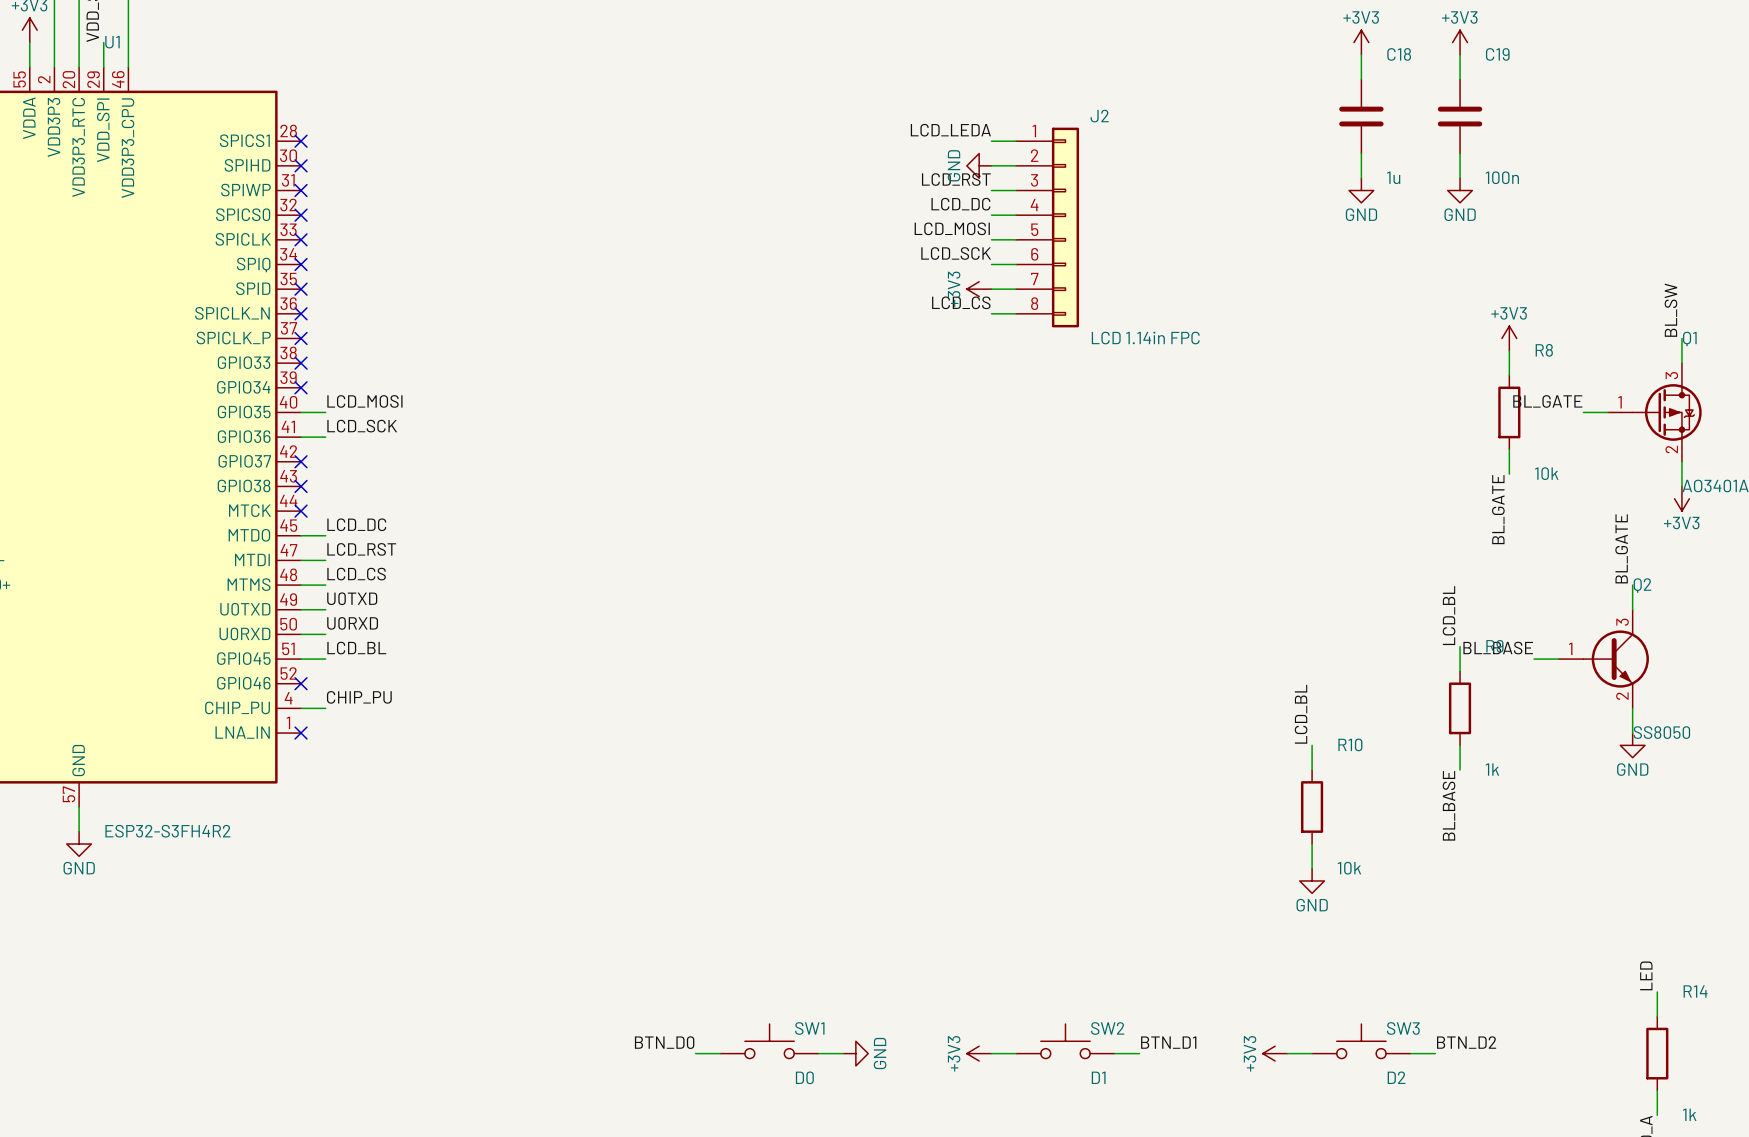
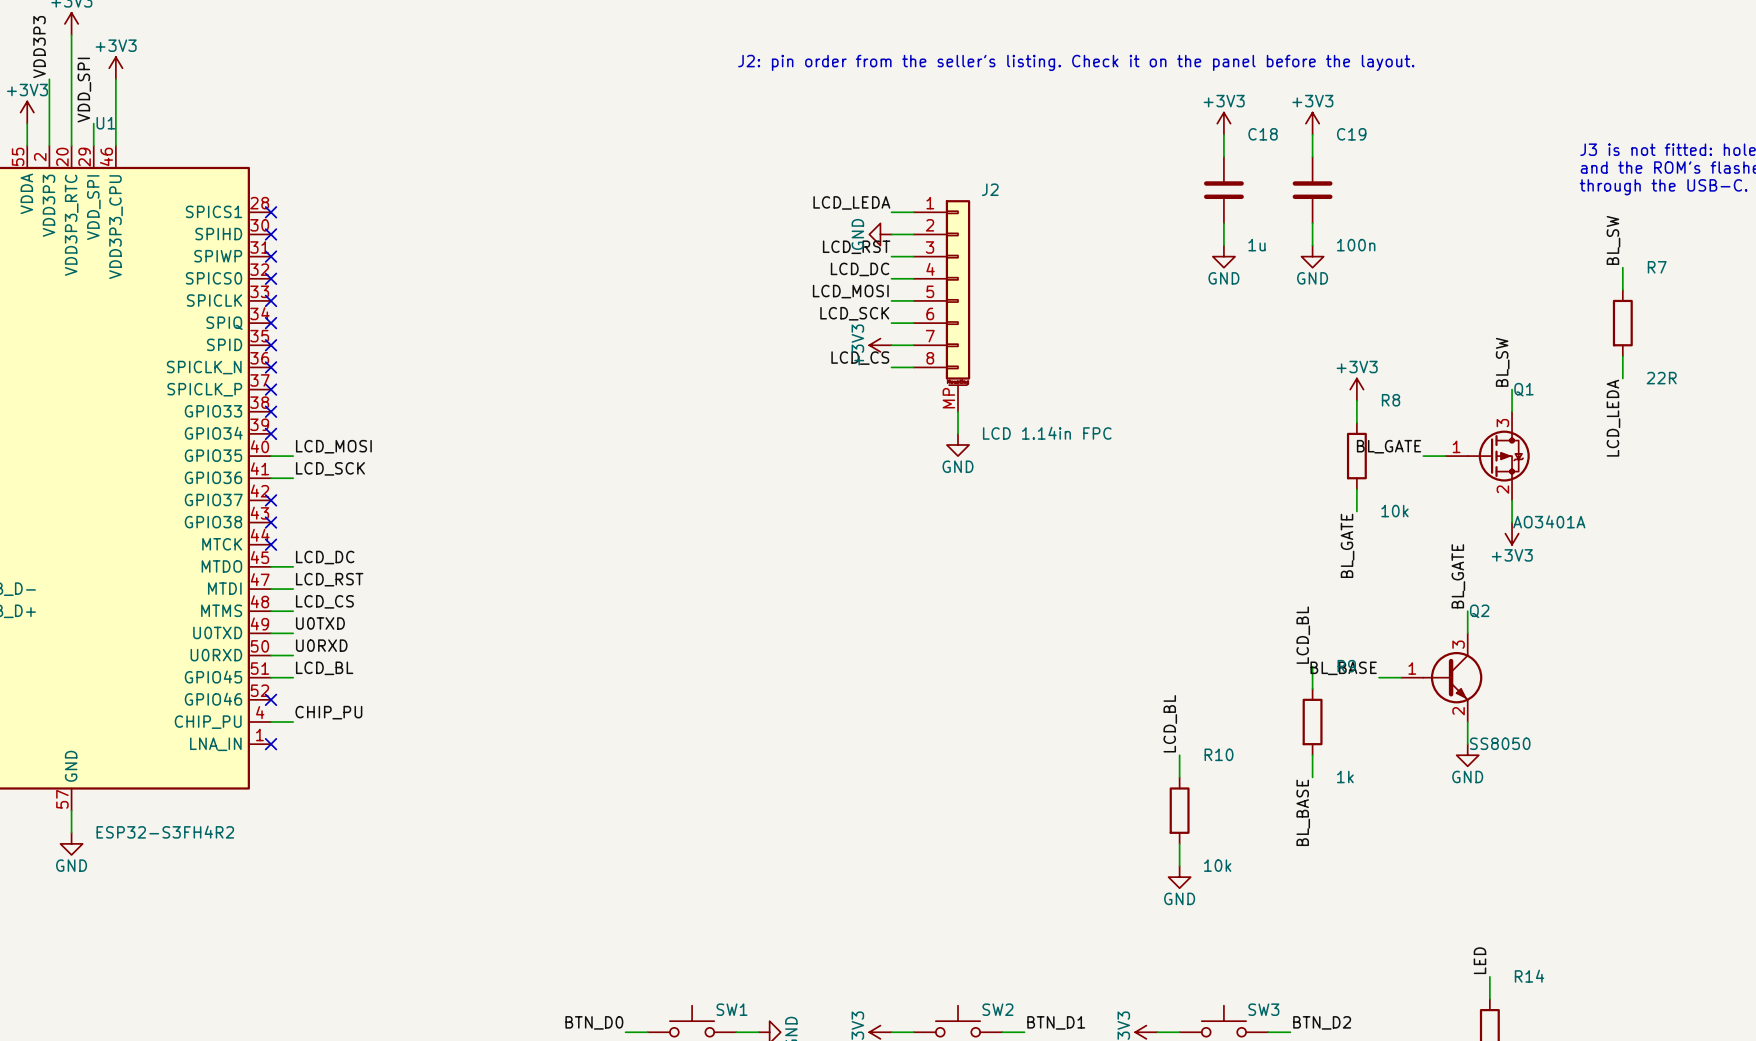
J2 symbol: [1016, 127, 1080, 328] -> [913, 200, 971, 412]
J2 value position: LCD 1.14in FPC (1145, 338) -> LCD 1.14in FPC (1047, 433)
wire: none -> (958, 411) (958, 433)
power symbol: none -> GND (958, 444)

